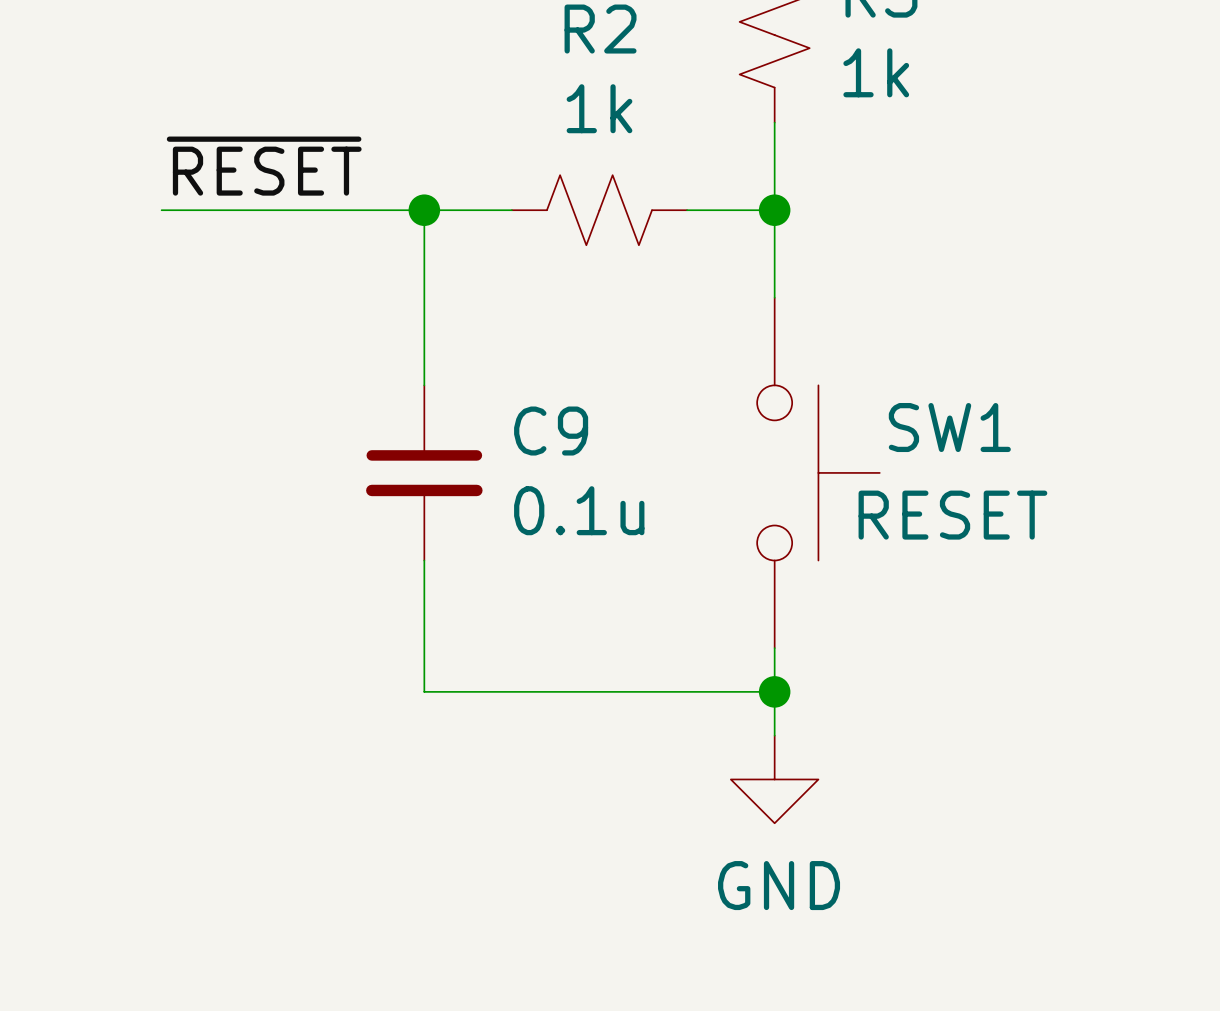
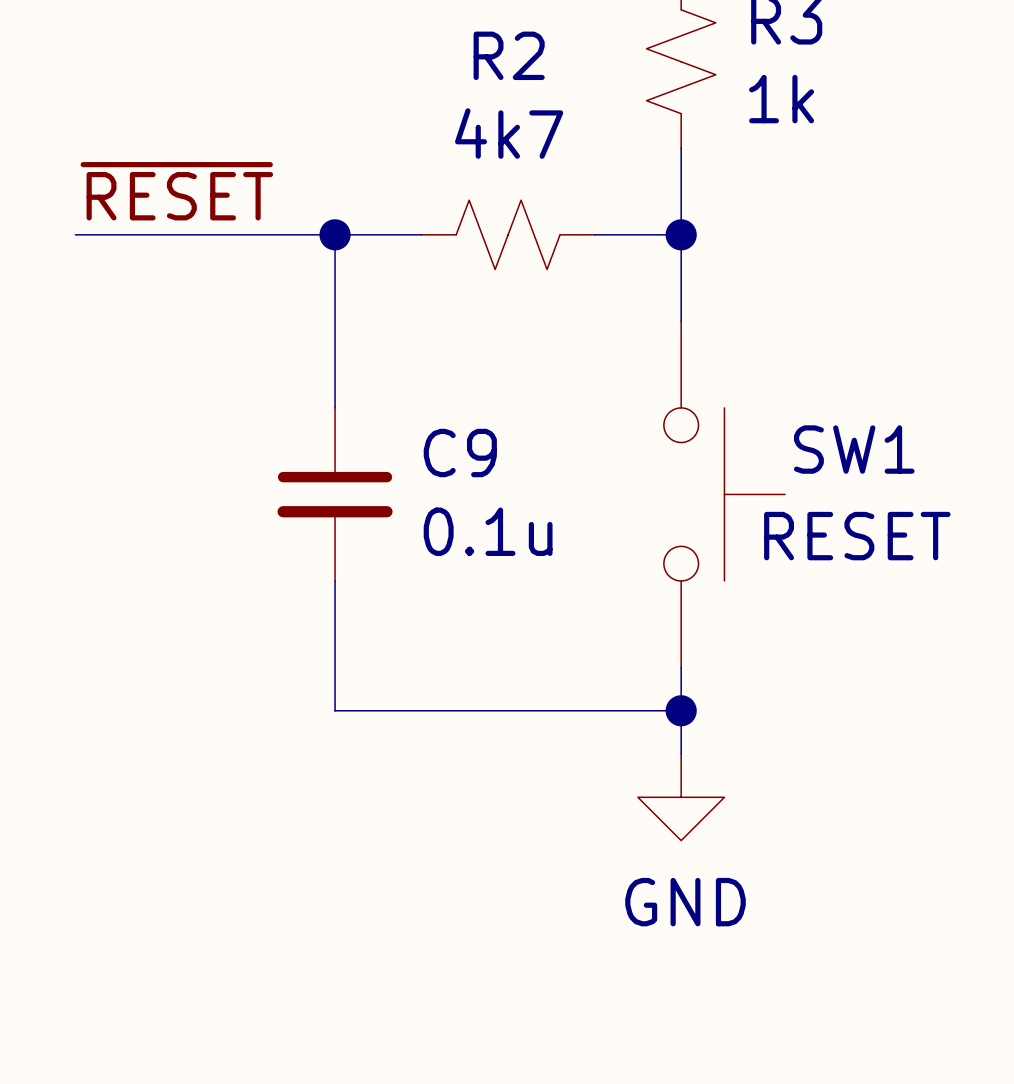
R2 value: 1k (599, 108) -> 4k7 (509, 133)

